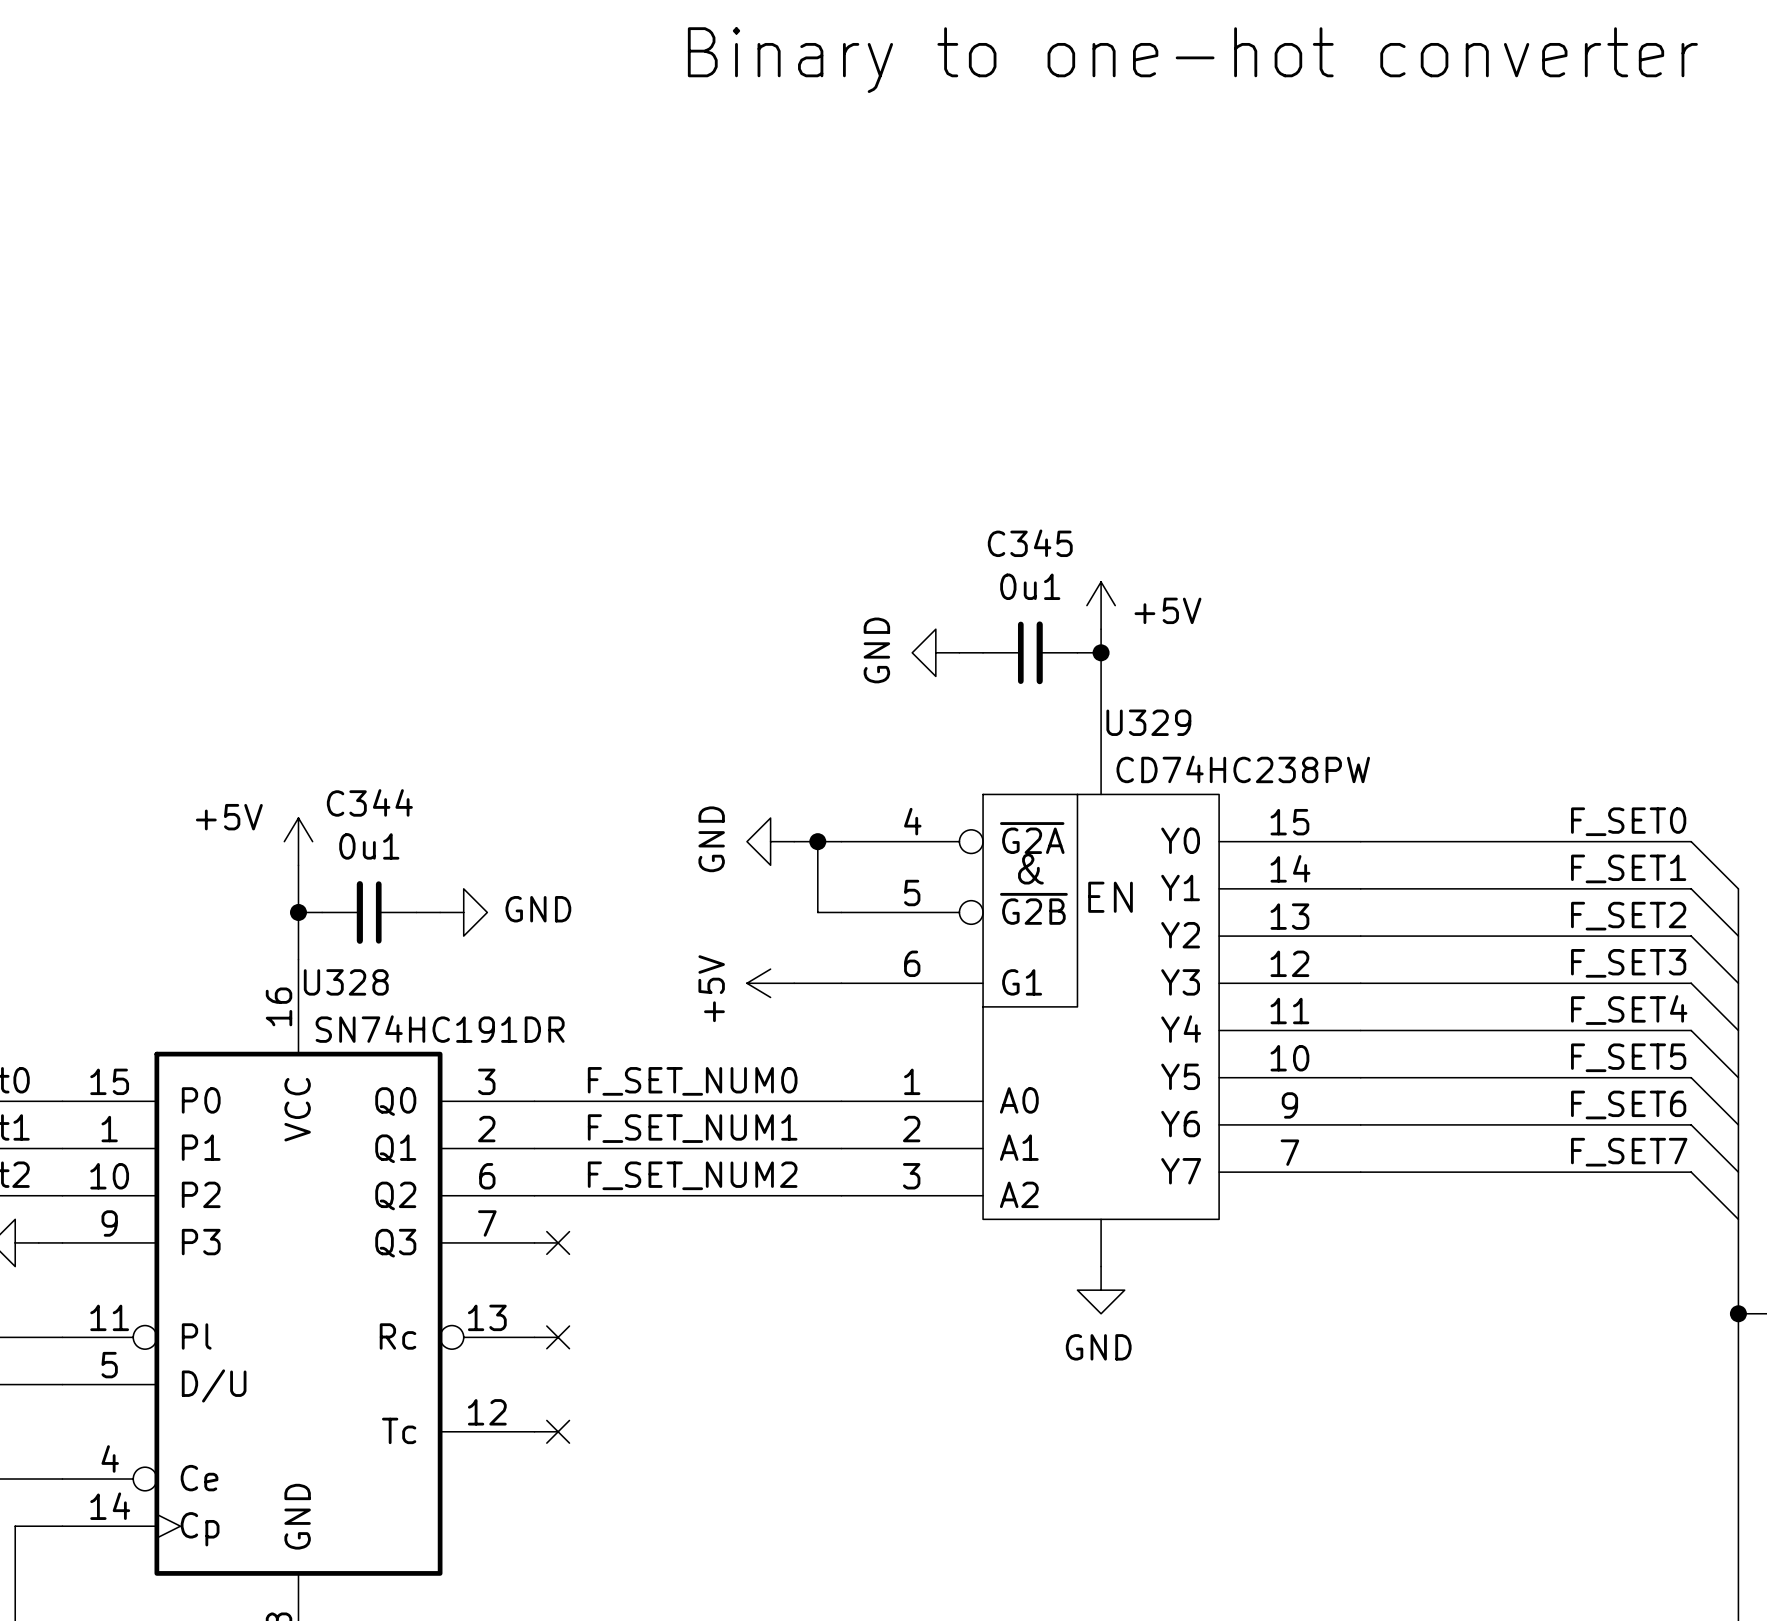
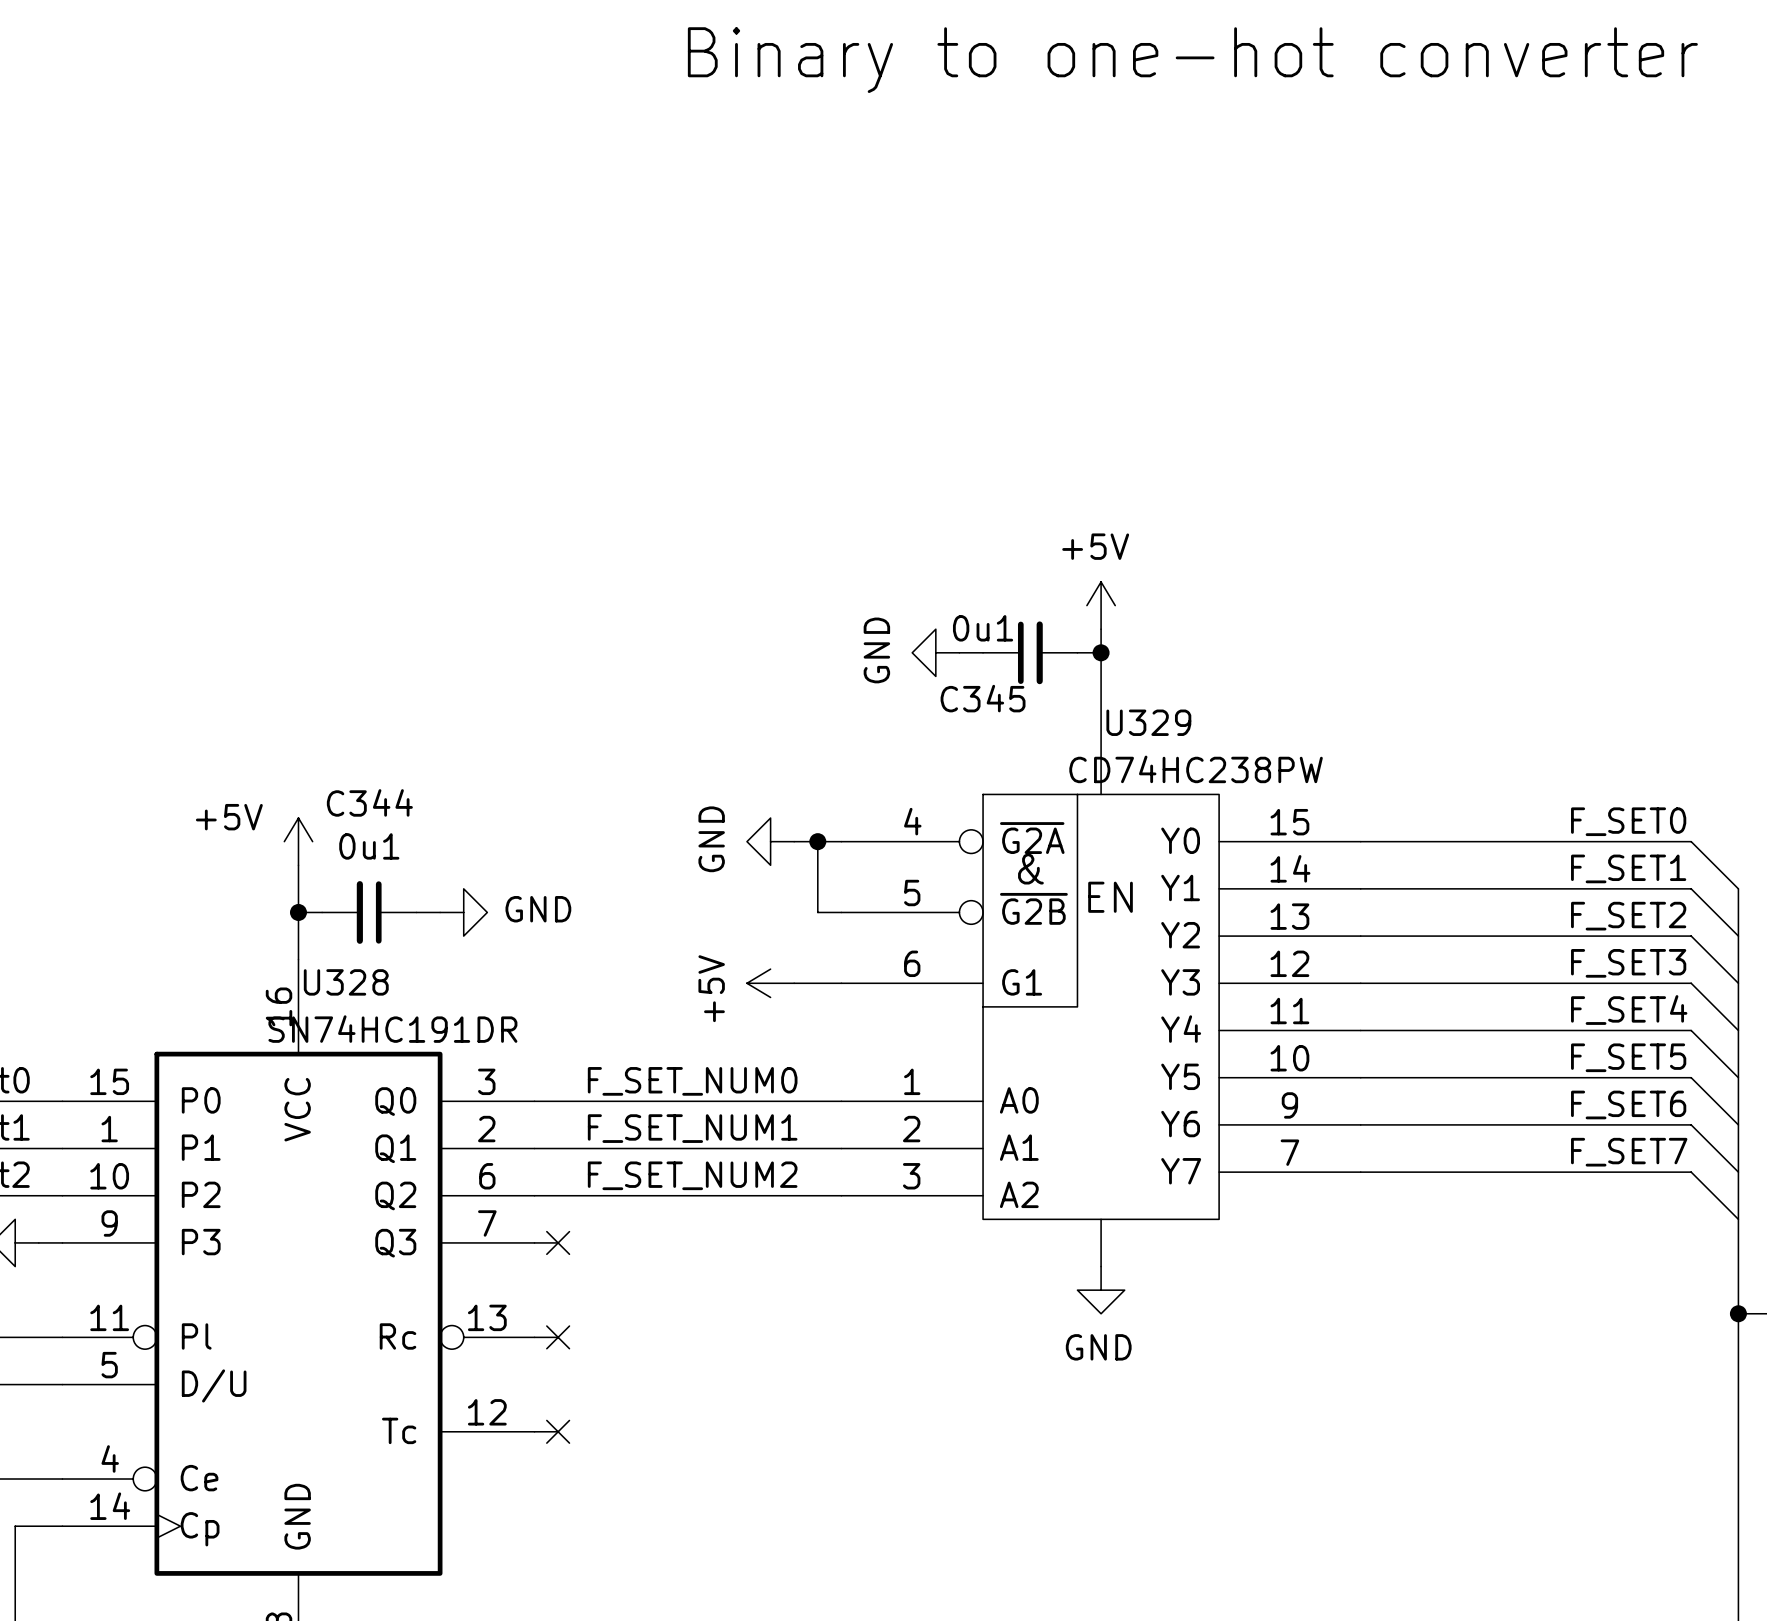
C345 name position: C345 (1030, 543) -> C345 (983, 698)
C345 value position: 0u1 (1030, 586) -> 0u1 (983, 628)
power symbol text position: +5V (1167, 610) -> +5V (1095, 546)
U329 value position: CD74HC238PW (1243, 769) -> CD74HC238PW (1196, 769)
U328 value position: SN74HC191DR (440, 1029) -> SN74HC191DR (392, 1029)

